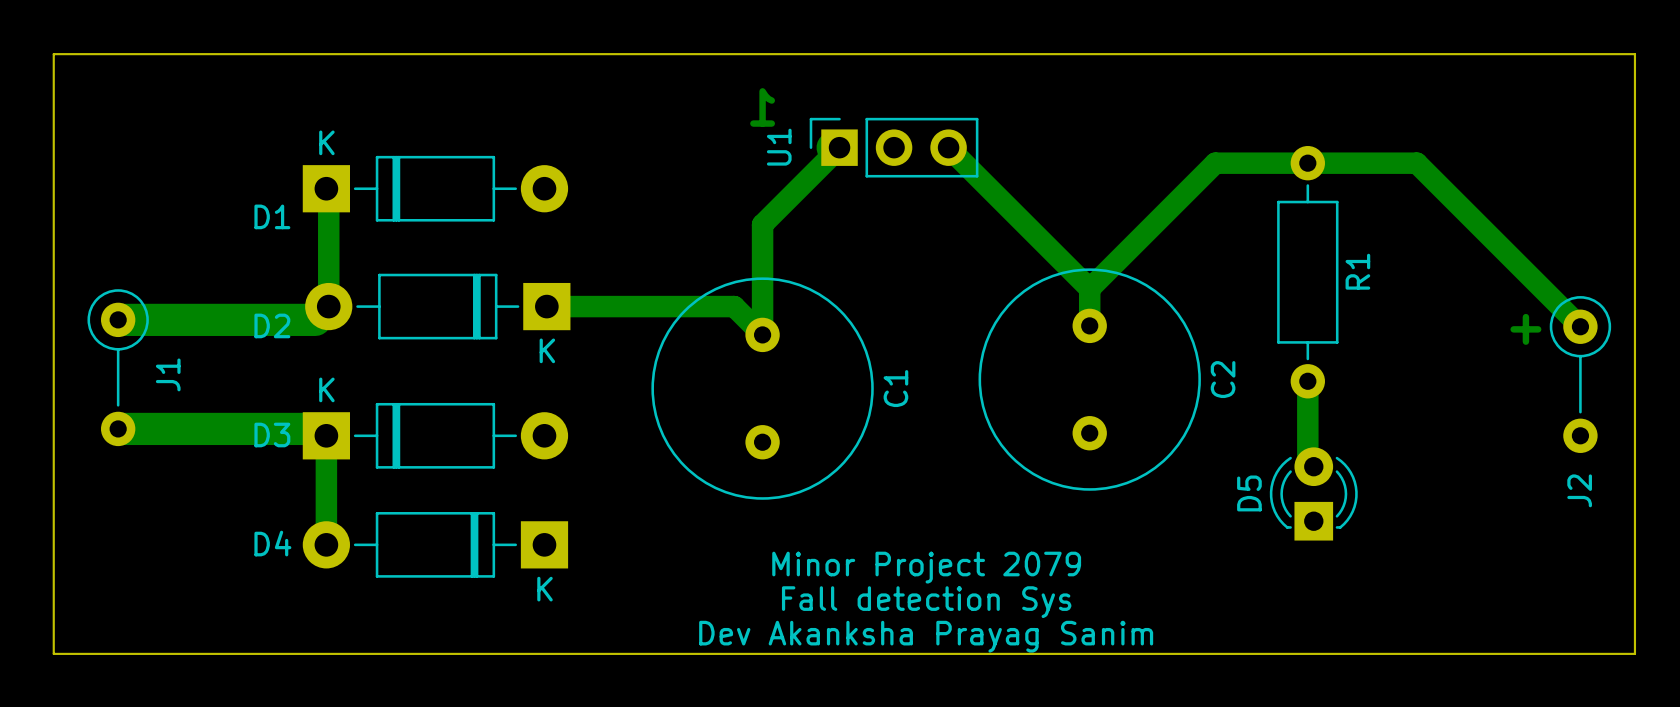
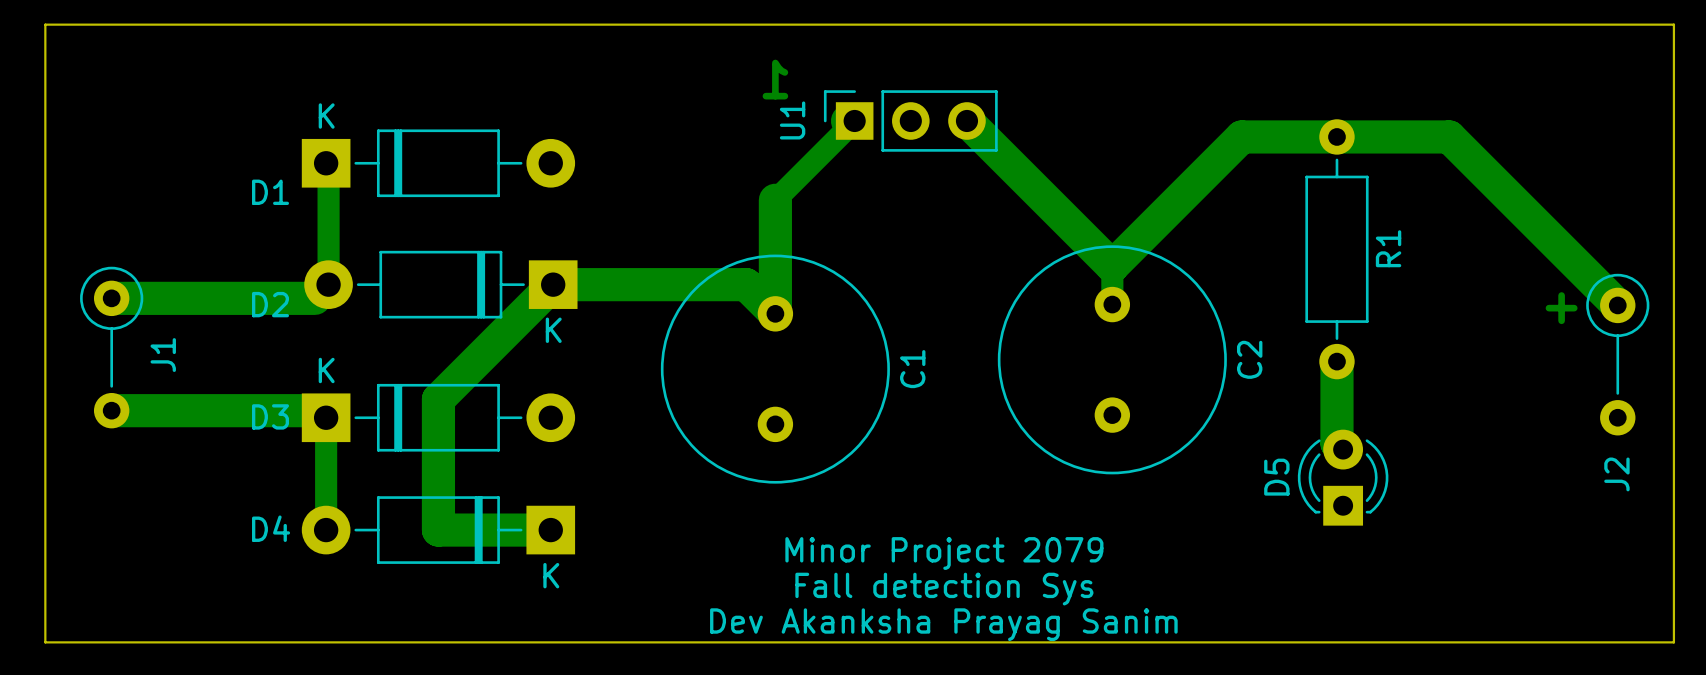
bottom track width: thin (948, 147) (1089, 288) (1215, 163) (1416, 163) (1580, 326) -> thick (966, 120) (1112, 266) (1241, 136) (1449, 136) (1617, 305)
bottom track width: thin (762, 224) (762, 334) (734, 306) (546, 306) -> thick (775, 200) (775, 313) (746, 284) (553, 284)
bottom track: none -> (553, 284) (438, 399) (438, 530) (550, 530)
bottom track width: thin (1307, 381) (1307, 460) (1313, 466) -> thick (1336, 361) (1336, 443) (1343, 449)

